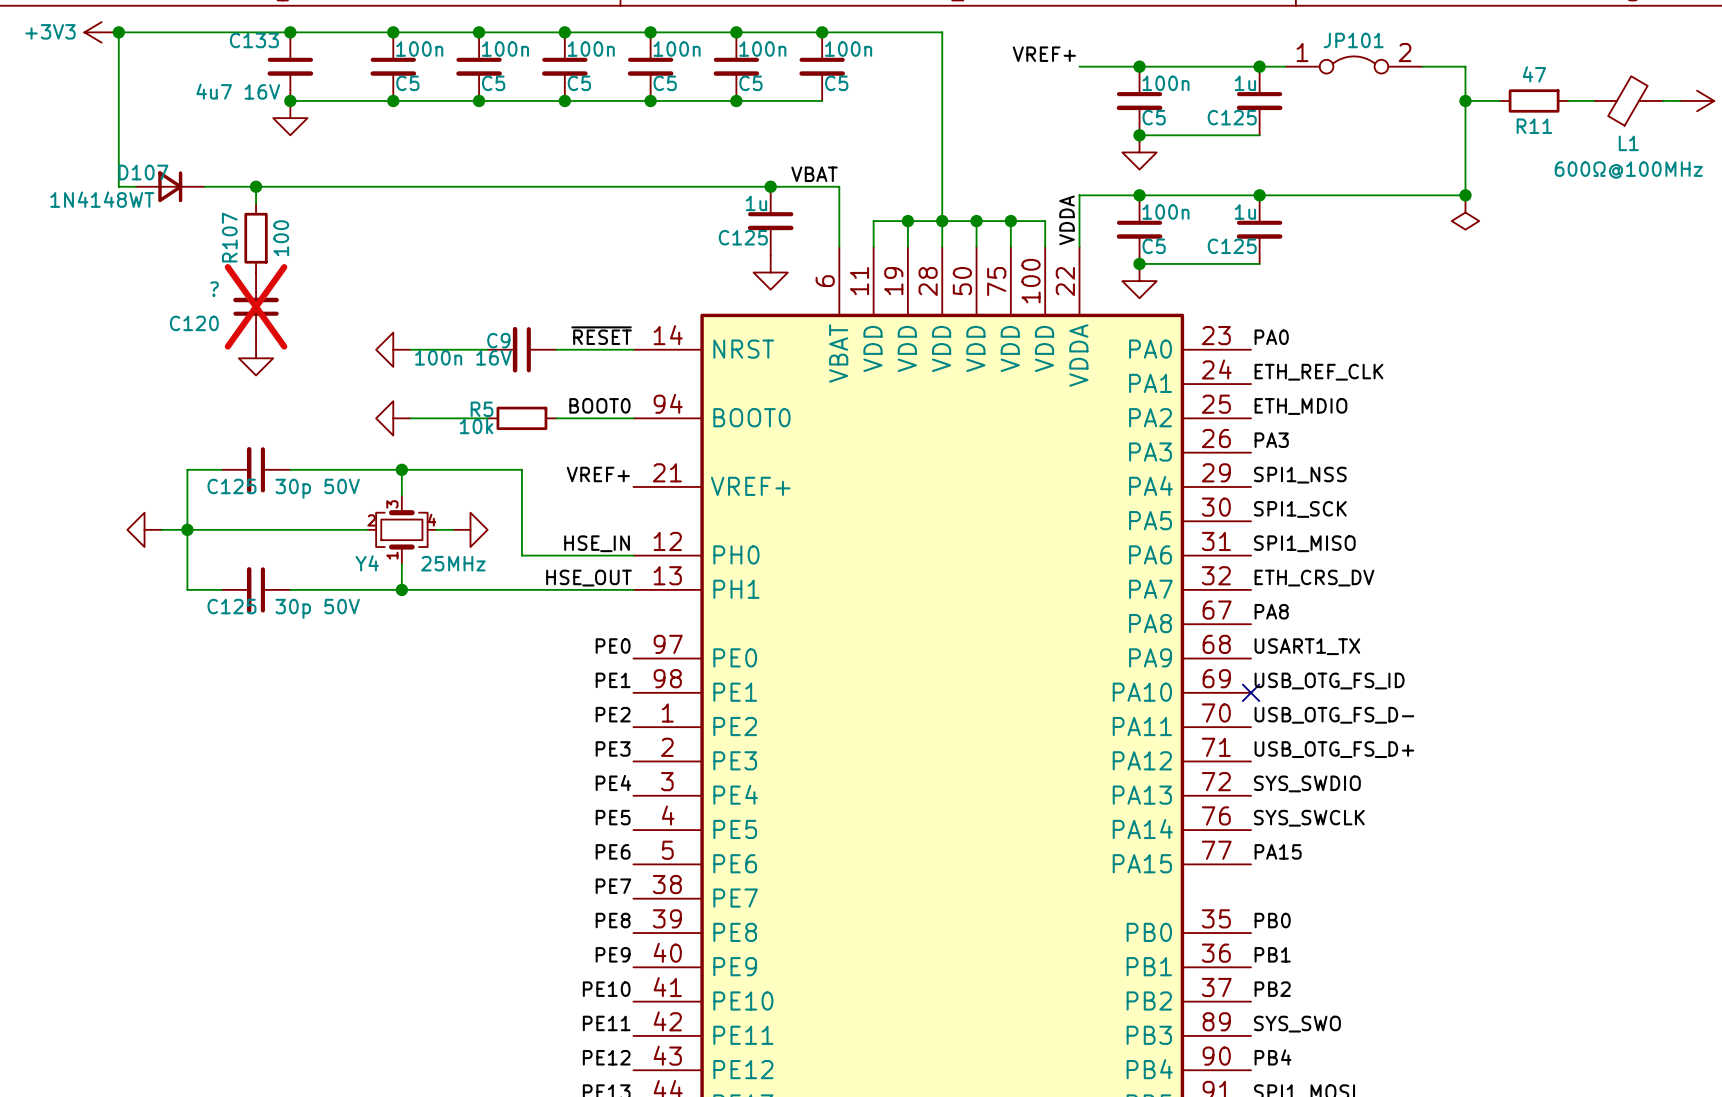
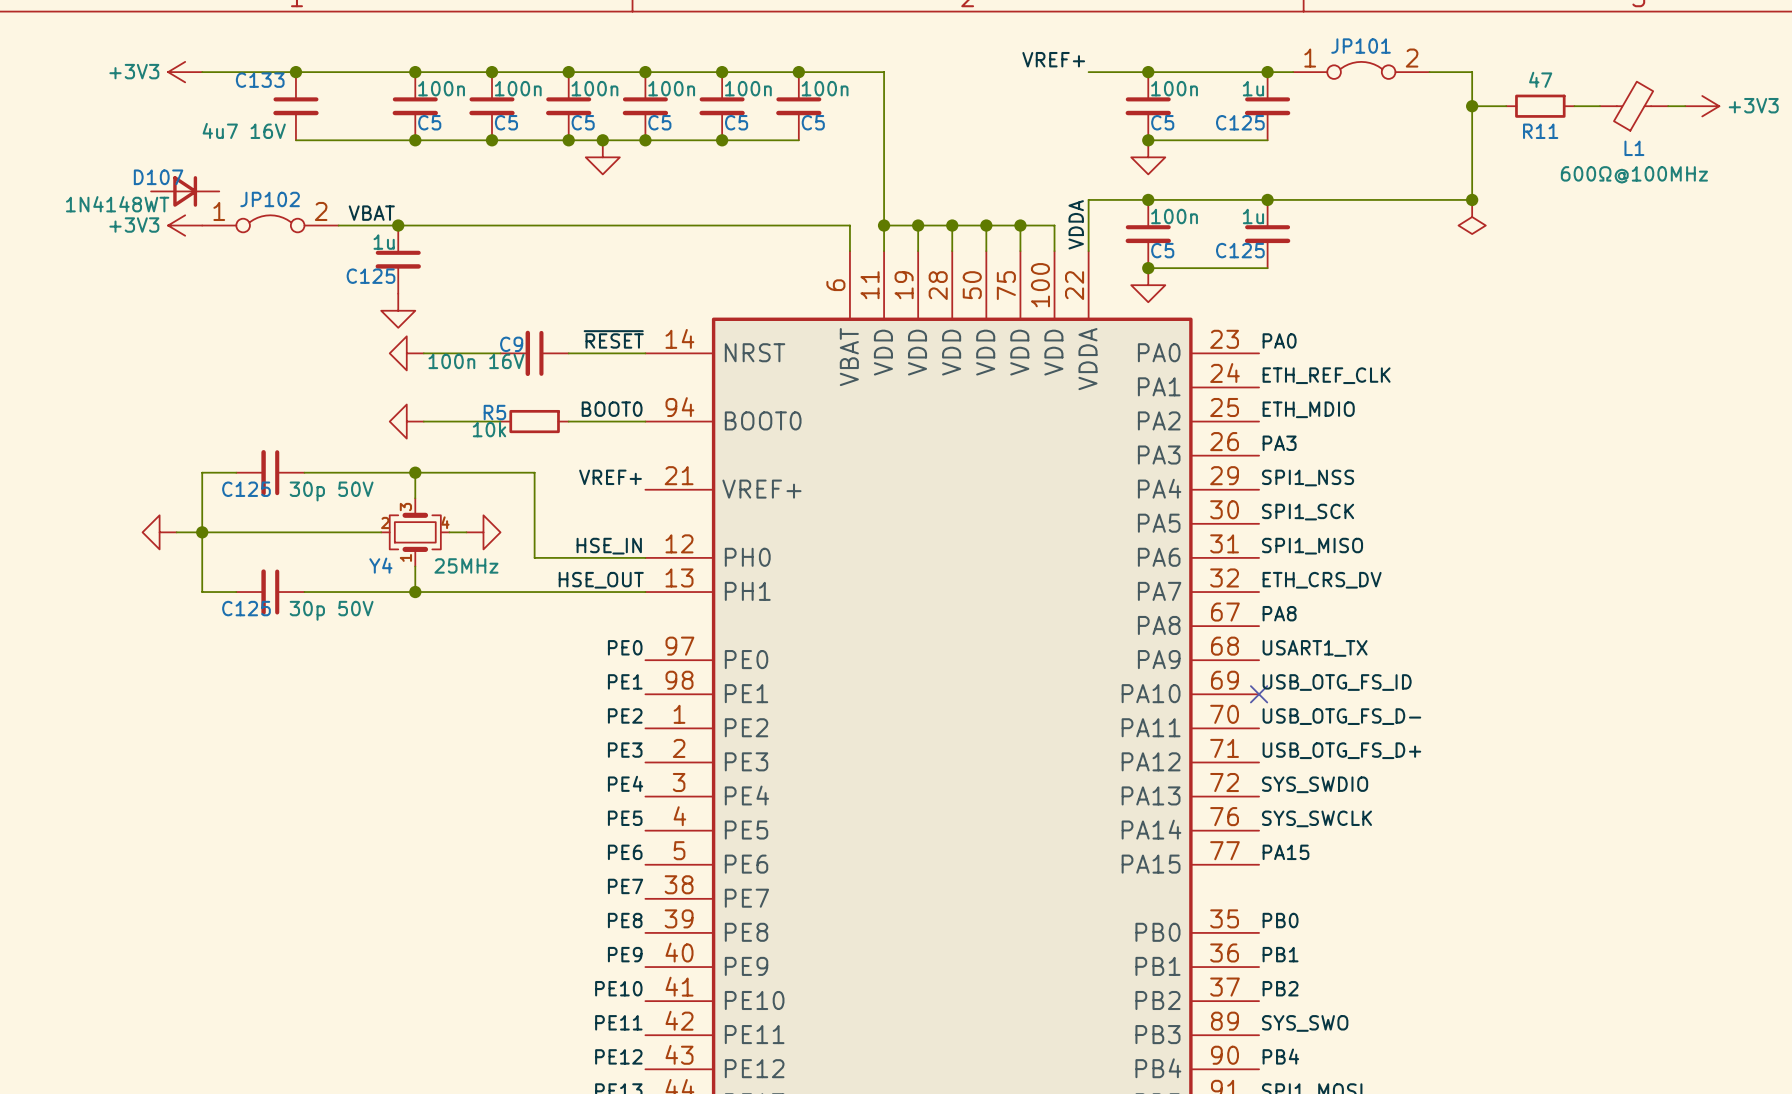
power symbol position: +3V3 (101, 32) -> +3V3 (185, 72)
junction: (118, 32) -> none
junction: (290, 32) -> none
junction: (393, 32) -> none
junction: (479, 32) -> none
junction: (564, 32) -> none
junction: (650, 32) -> none
junction: (736, 32) -> none
junction: (822, 32) -> none
wire: none -> (202, 72) (884, 72) (884, 225)
junction: none -> (295, 72)
C133 position: (290, 66) -> (295, 106)
C5 position: (393, 66) -> (415, 106)
junction: none -> (415, 72)
junction: none -> (492, 72)
C5 position: (479, 66) -> (492, 106)
junction: none -> (568, 72)
C5 position: (564, 66) -> (568, 106)
junction: none -> (645, 72)
C5: 100n (650, 66) -> none
junction: none -> (722, 72)
C5: 100n (736, 66) -> none
junction: none -> (798, 72)
C5: 100n (822, 66) -> none
wire: (290, 100) (822, 100) -> none
junction: (290, 100) -> none
junction: (393, 100) -> none
junction: (479, 100) -> none
junction: (564, 100) -> none
C5: none -> 100n (645, 106)
junction: (650, 100) -> none
C5: none -> 100n (722, 106)
junction: (736, 100) -> none
C5: none -> 100n (798, 106)
power symbol: (290, 118) -> none
wire: none -> (295, 140) (798, 140)
junction: none -> (415, 140)
junction: none -> (492, 140)
junction: none -> (568, 140)
junction: none -> (602, 140)
junction: none -> (645, 140)
junction: none -> (722, 140)
power symbol: none -> (602, 157)
label: VBAT (814, 174) -> none
wire: (135, 186) (118, 186) (118, 32) (942, 32) (942, 221) -> none
wire: (204, 186) (839, 186) (839, 221) -> (338, 225) (849, 225)
junction: (256, 186) -> none
junction: (770, 186) -> none
label: none -> VBAT (371, 213)
JP102: none -> (270, 223)
power symbol: none -> +3V3 (185, 225)
junction: none -> (398, 225)
C125: 1u (770, 221) -> none
junction: none -> (884, 225)
R107: 100 (256, 238) -> none
C125: none -> 1u (398, 259)
power symbol: (770, 272) -> none
C120: ? (256, 306) -> none
power symbol: none -> (398, 310)
power symbol: (256, 358) -> none

